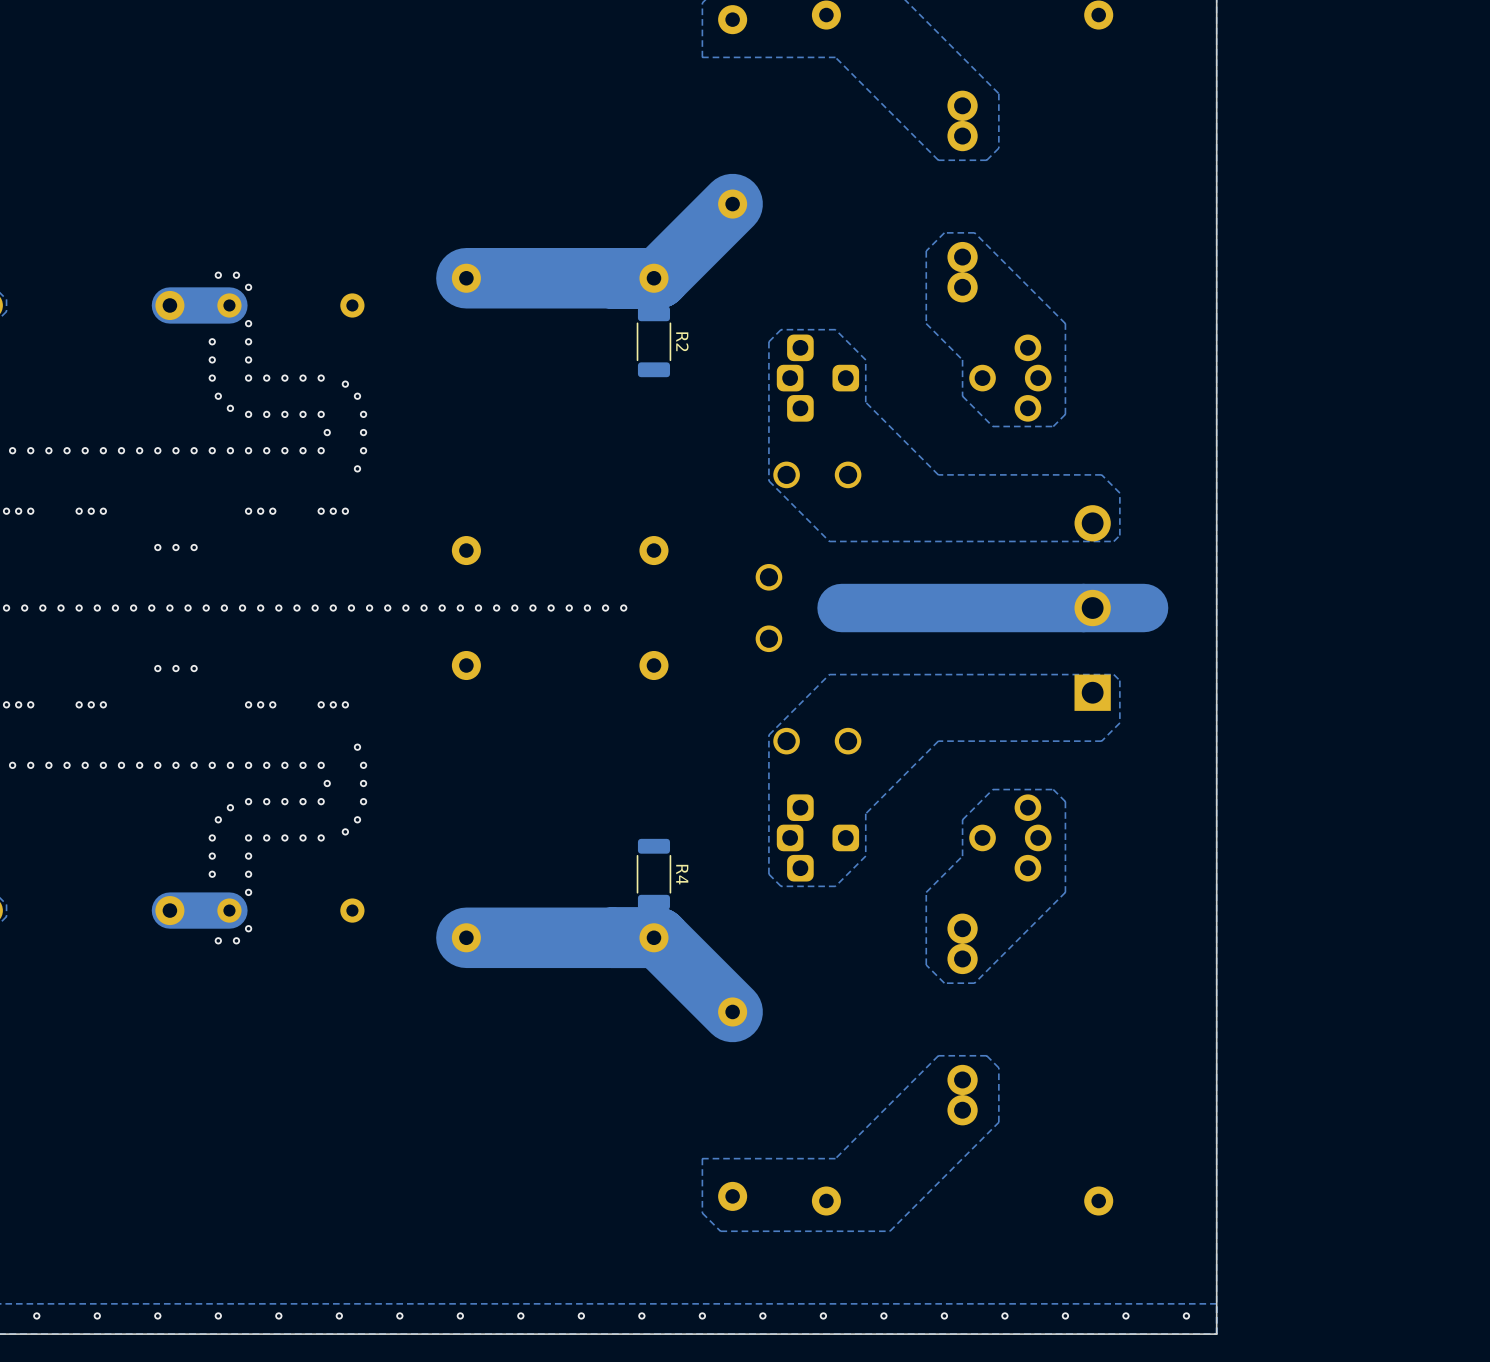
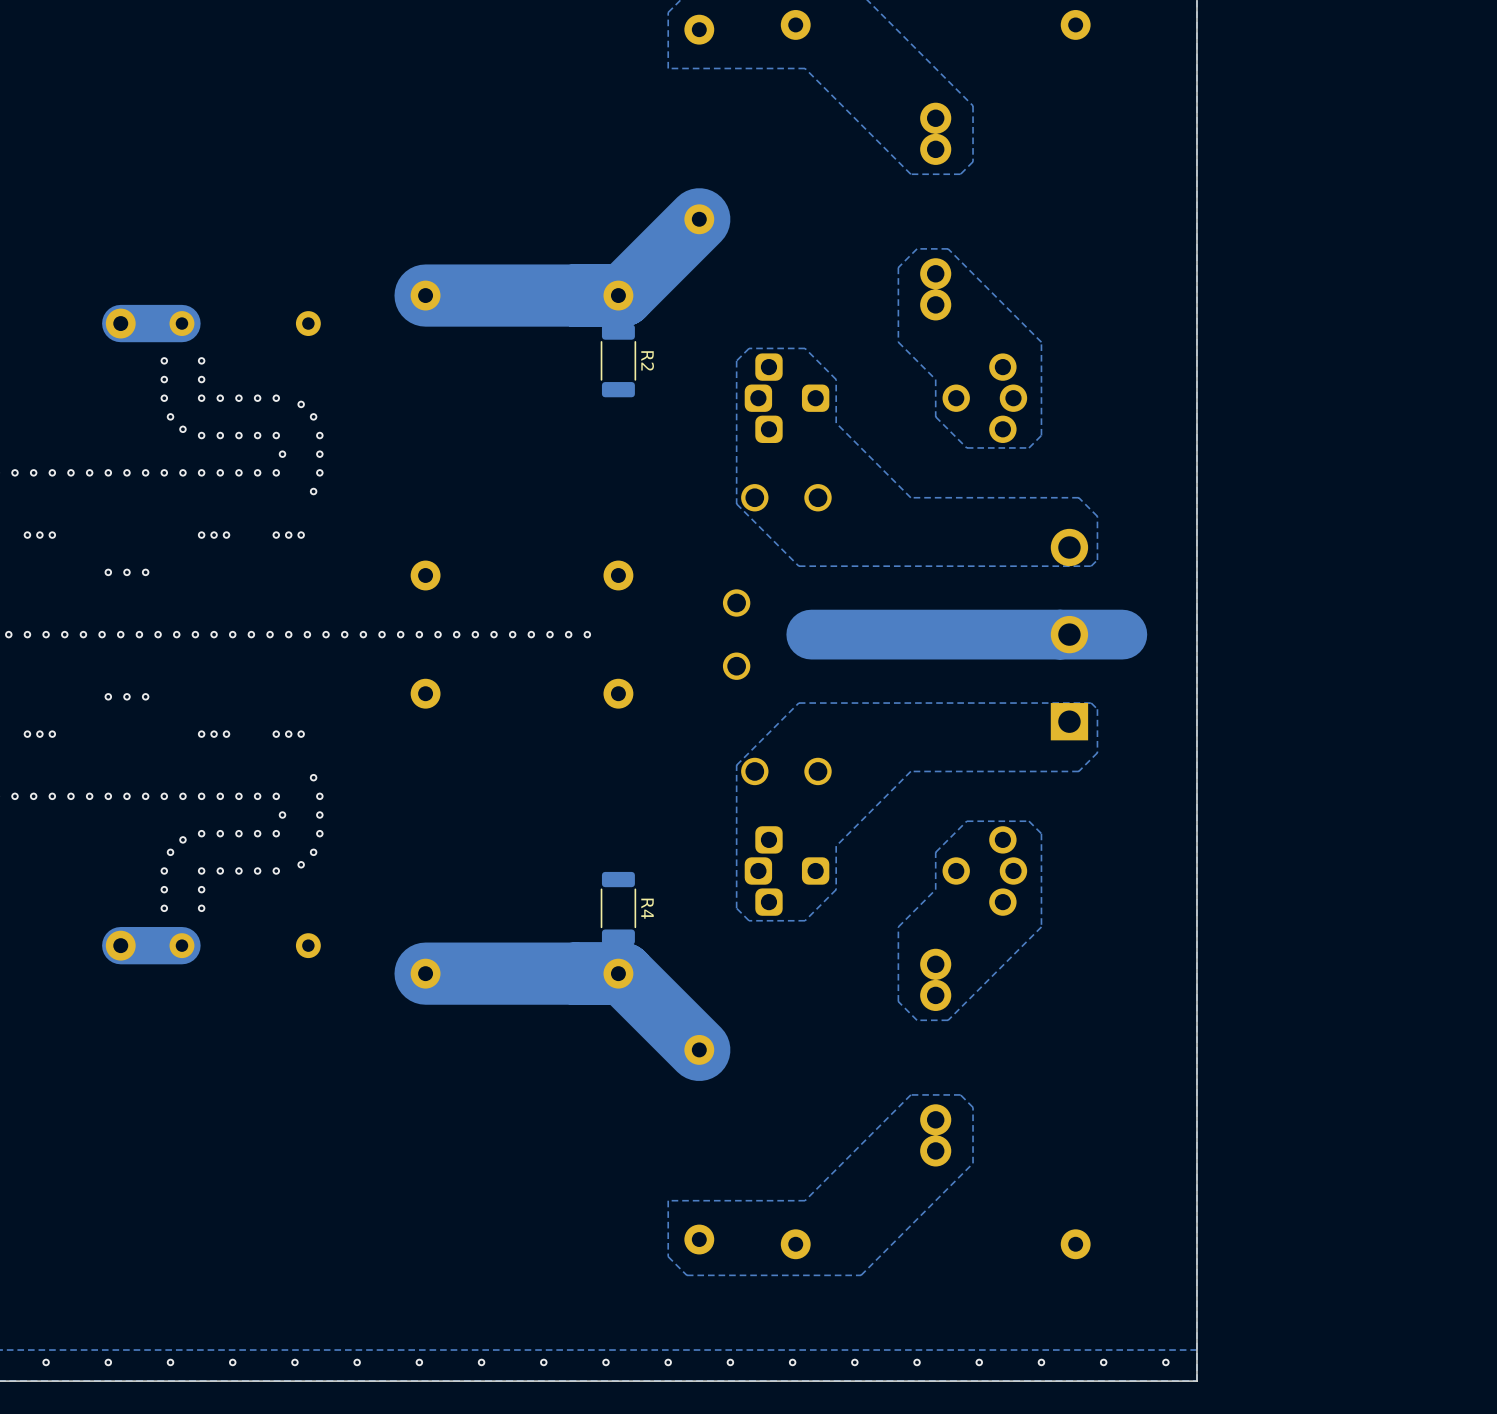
via: (218, 275) -> none
via: (236, 275) -> none
via: (248, 287) -> none
via: (248, 323) -> none
via: (248, 892) -> none
via: (248, 928) -> none
via: (218, 940) -> none
via: (236, 940) -> none

